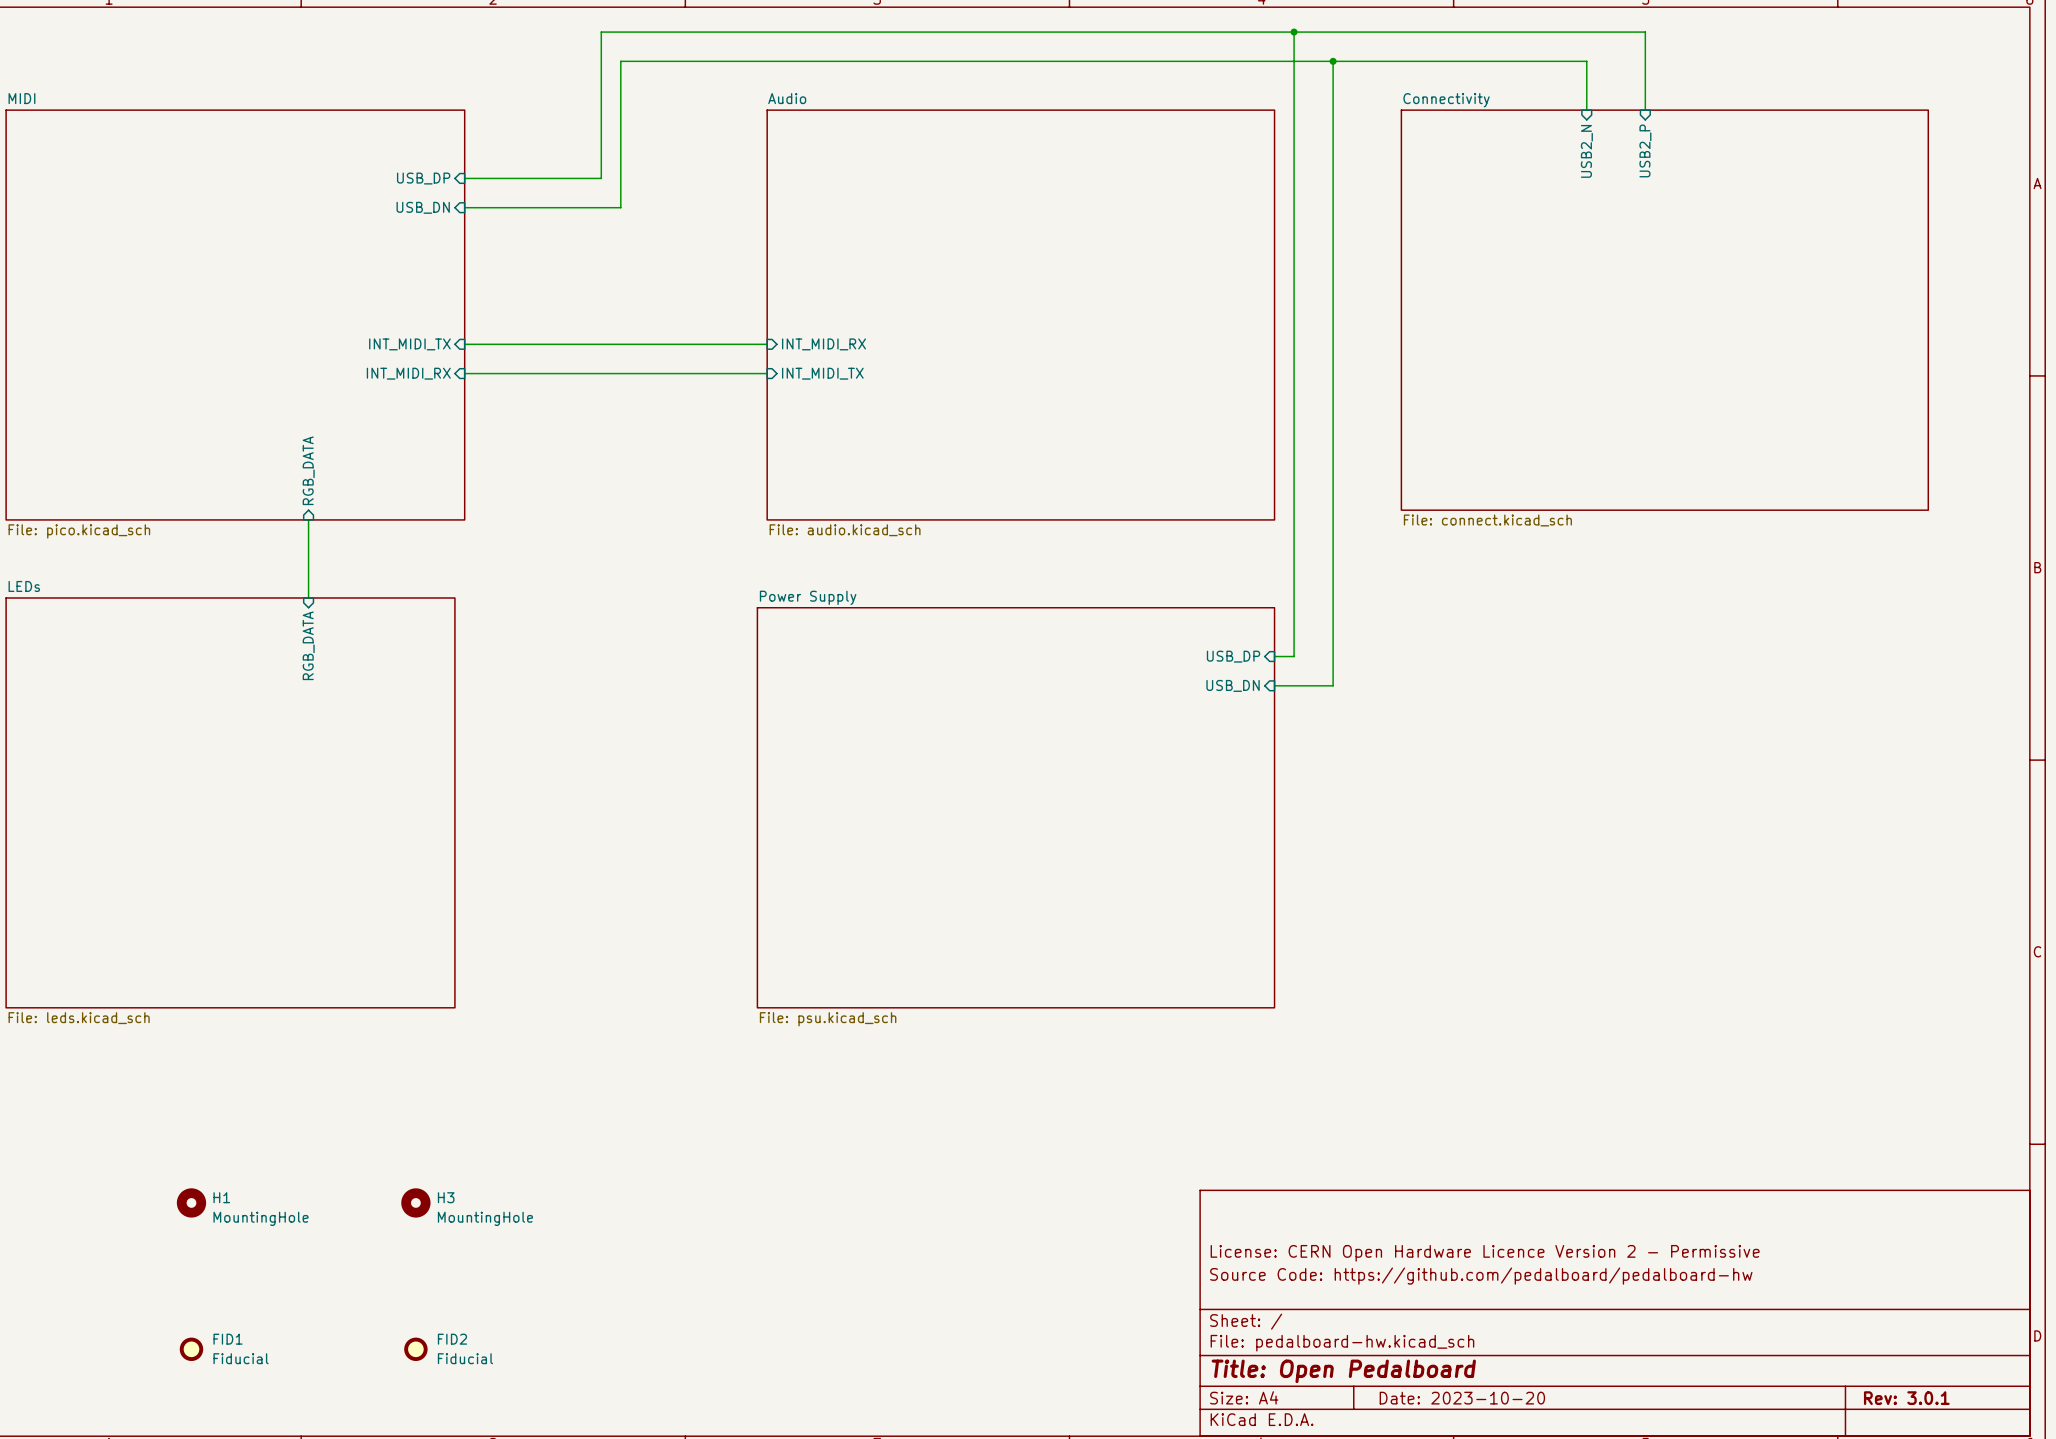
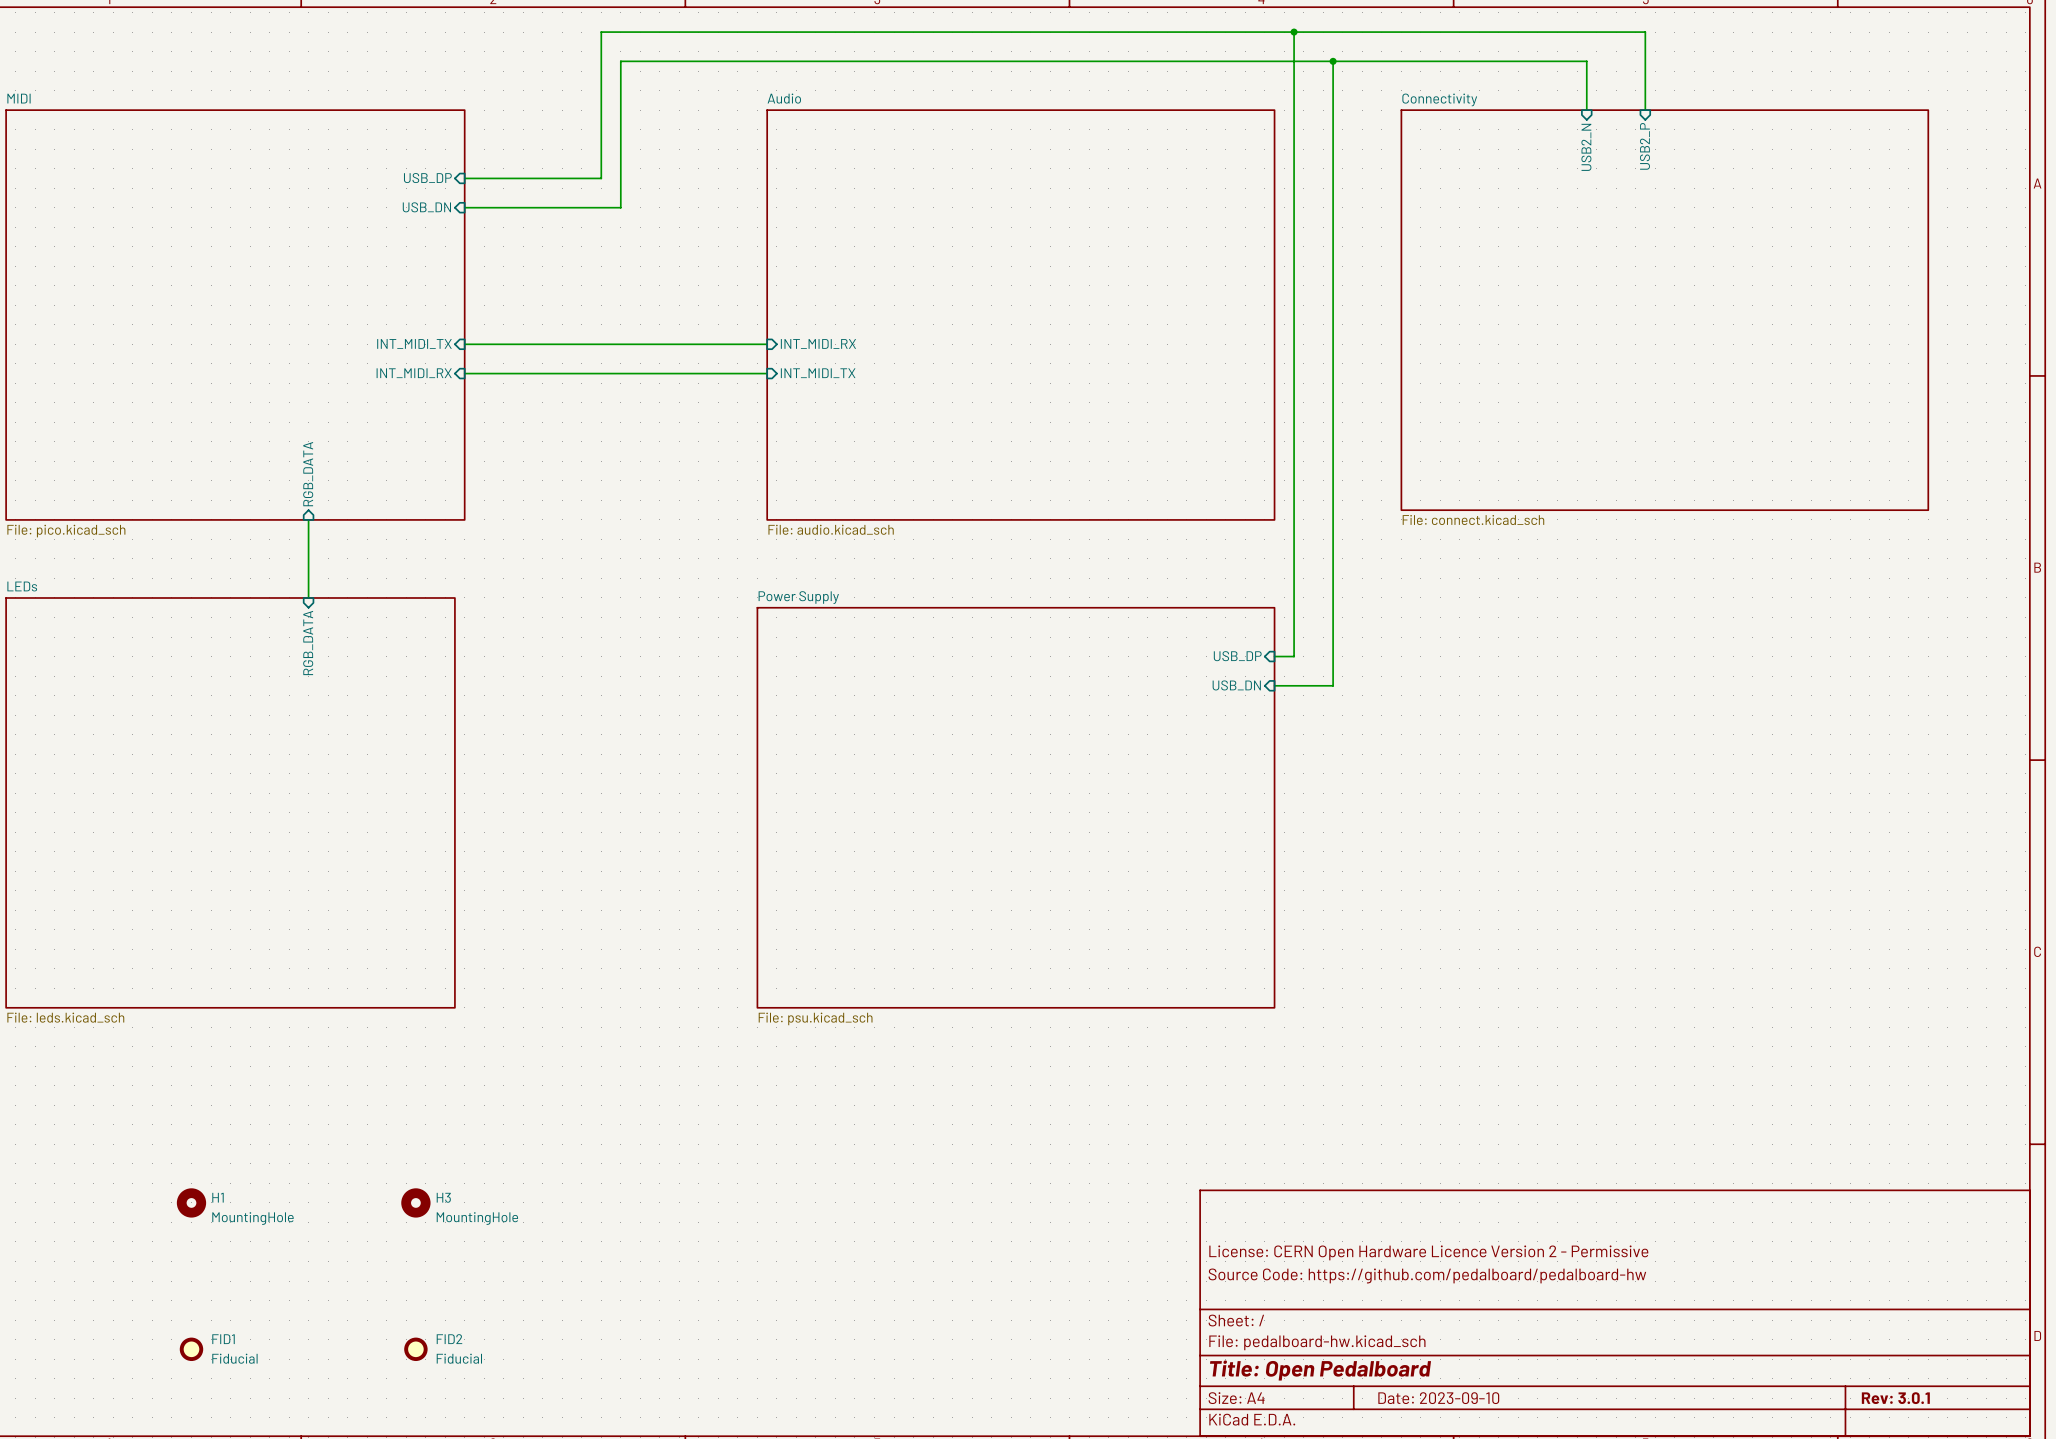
title block: Date: 2023-10-20 (1462, 1398) -> Date: 2023-09-10 (1438, 1398)

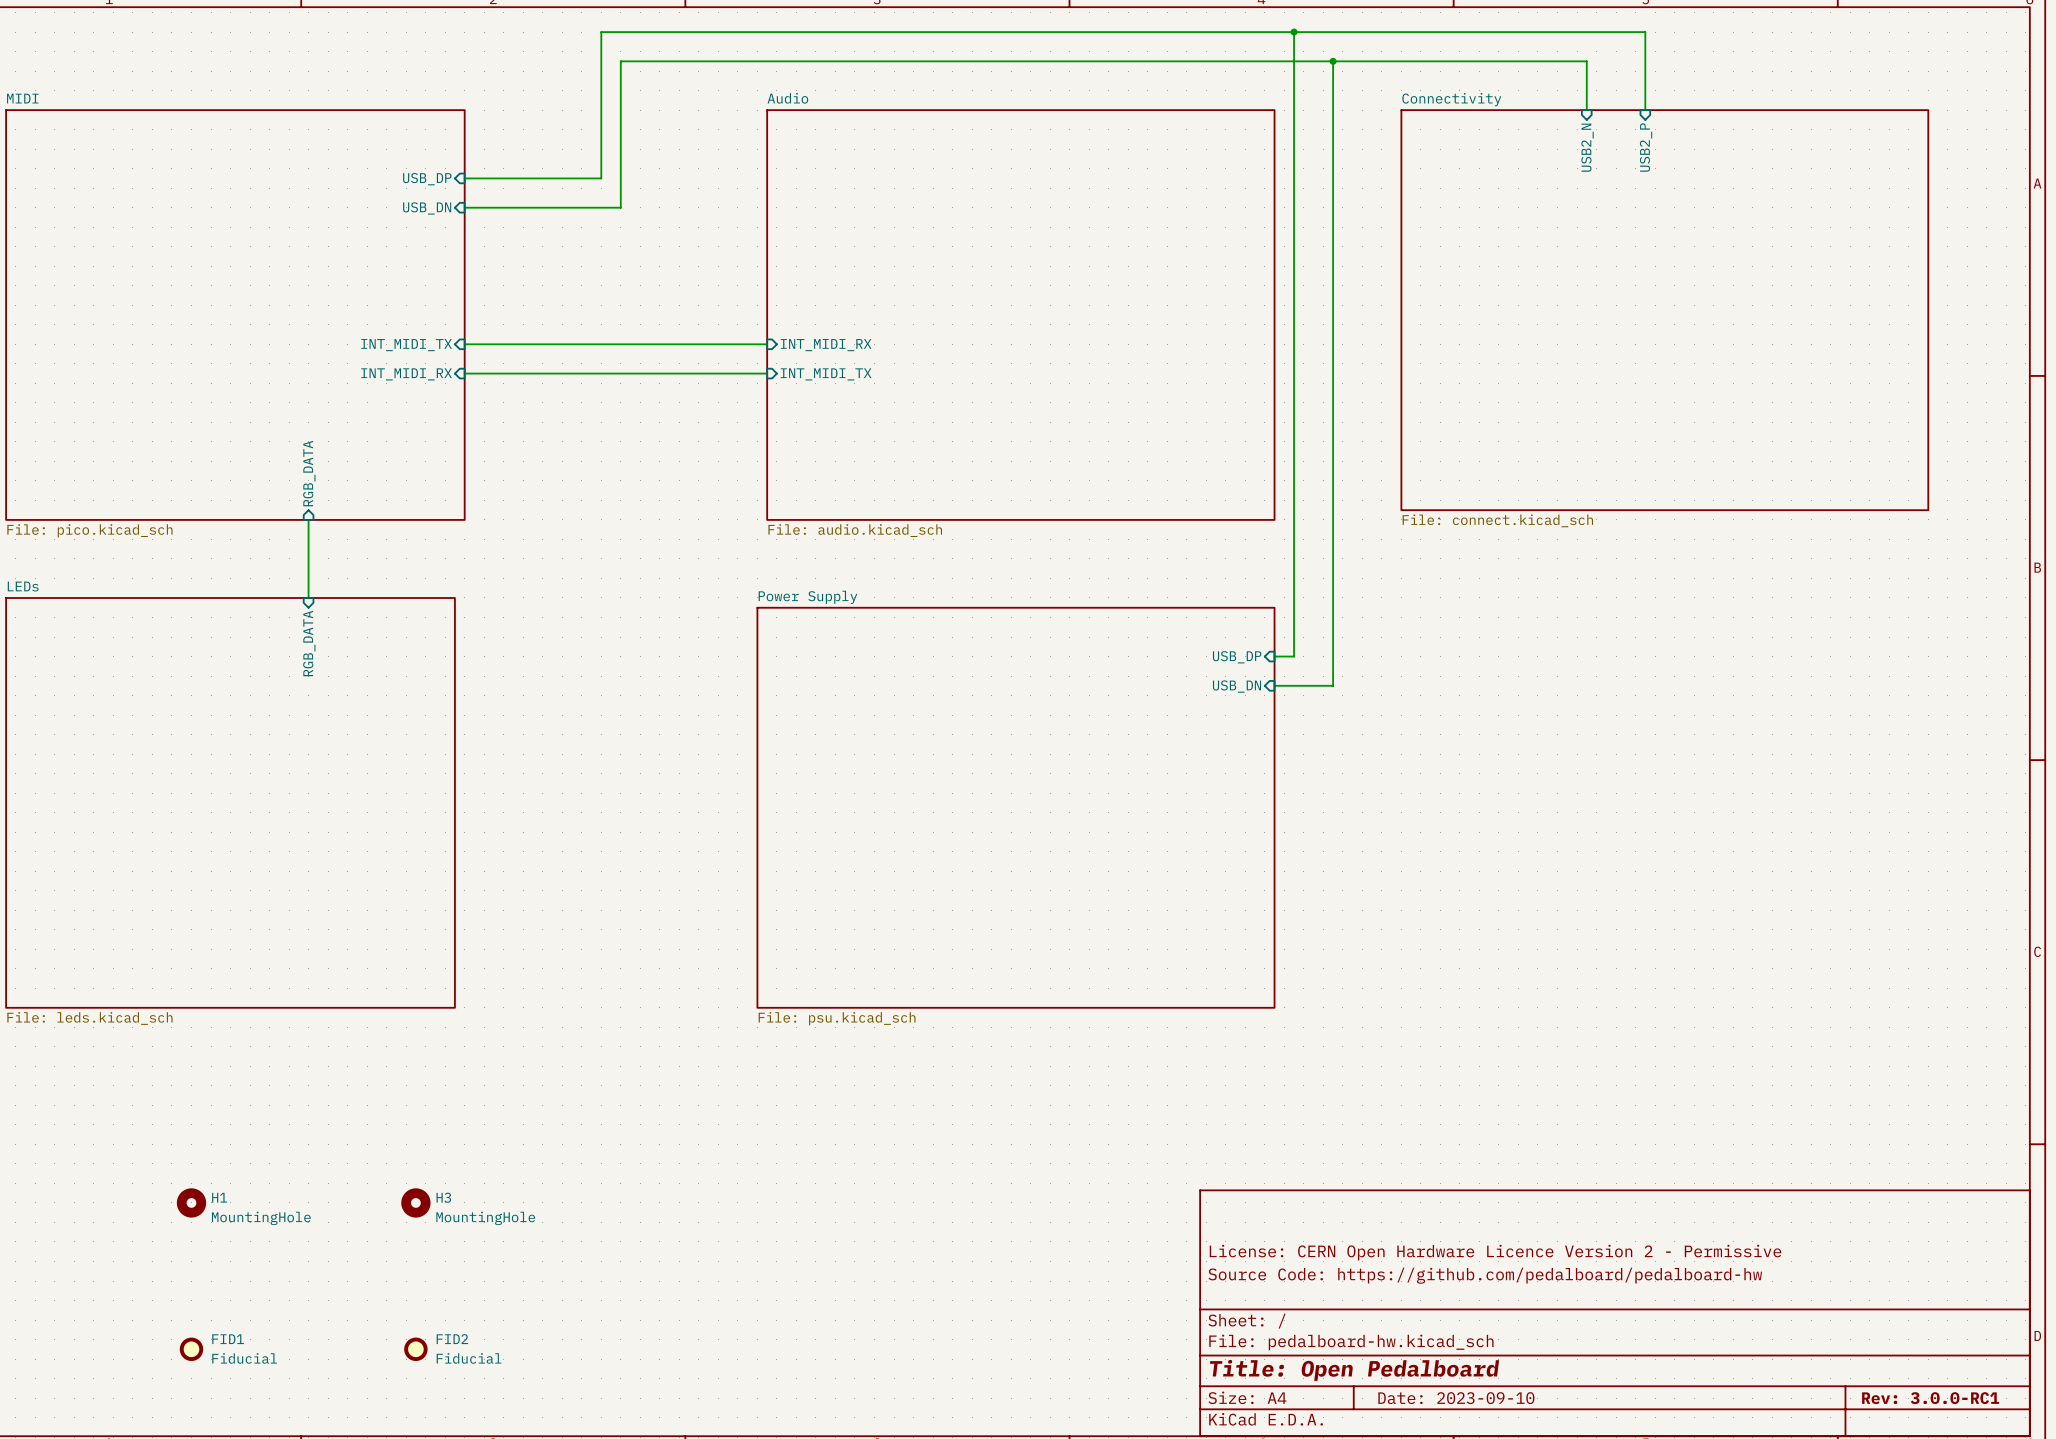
title block: Rev: 3.0.1 (1895, 1398) -> Rev: 3.0.0-RC1 (1930, 1398)

